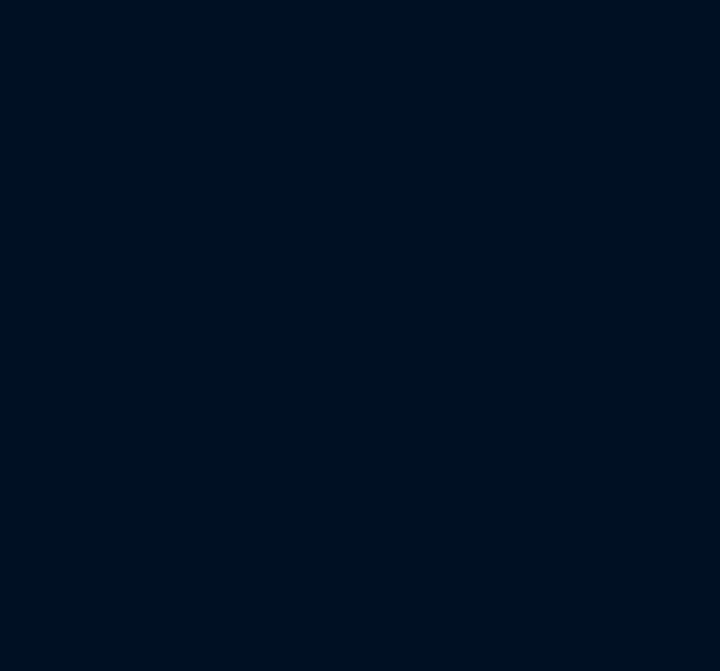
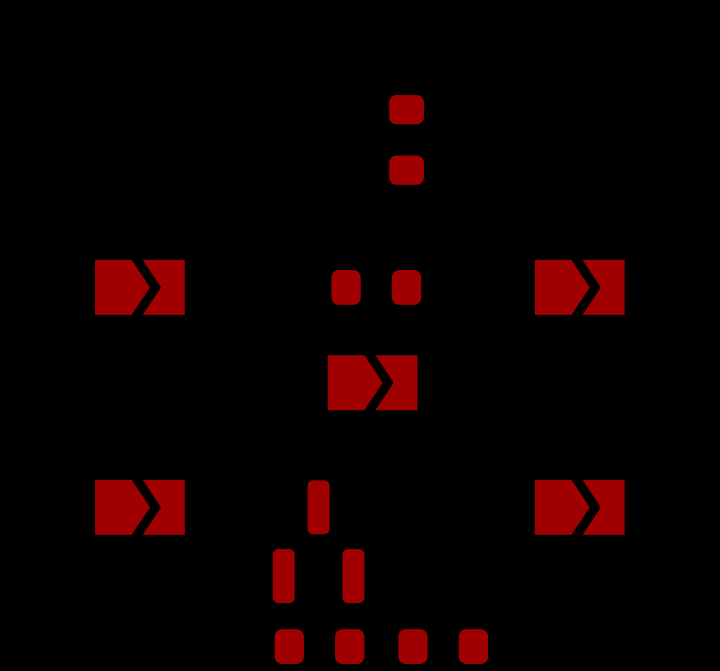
part: none -> (406, 139)
part: none -> (139, 287)
part: none -> (376, 287)
part: none -> (579, 287)
part: none -> (372, 382)
part: none -> (139, 507)
part: none -> (579, 507)
part: none -> (318, 541)
part: none -> (319, 646)
part: none -> (443, 646)

